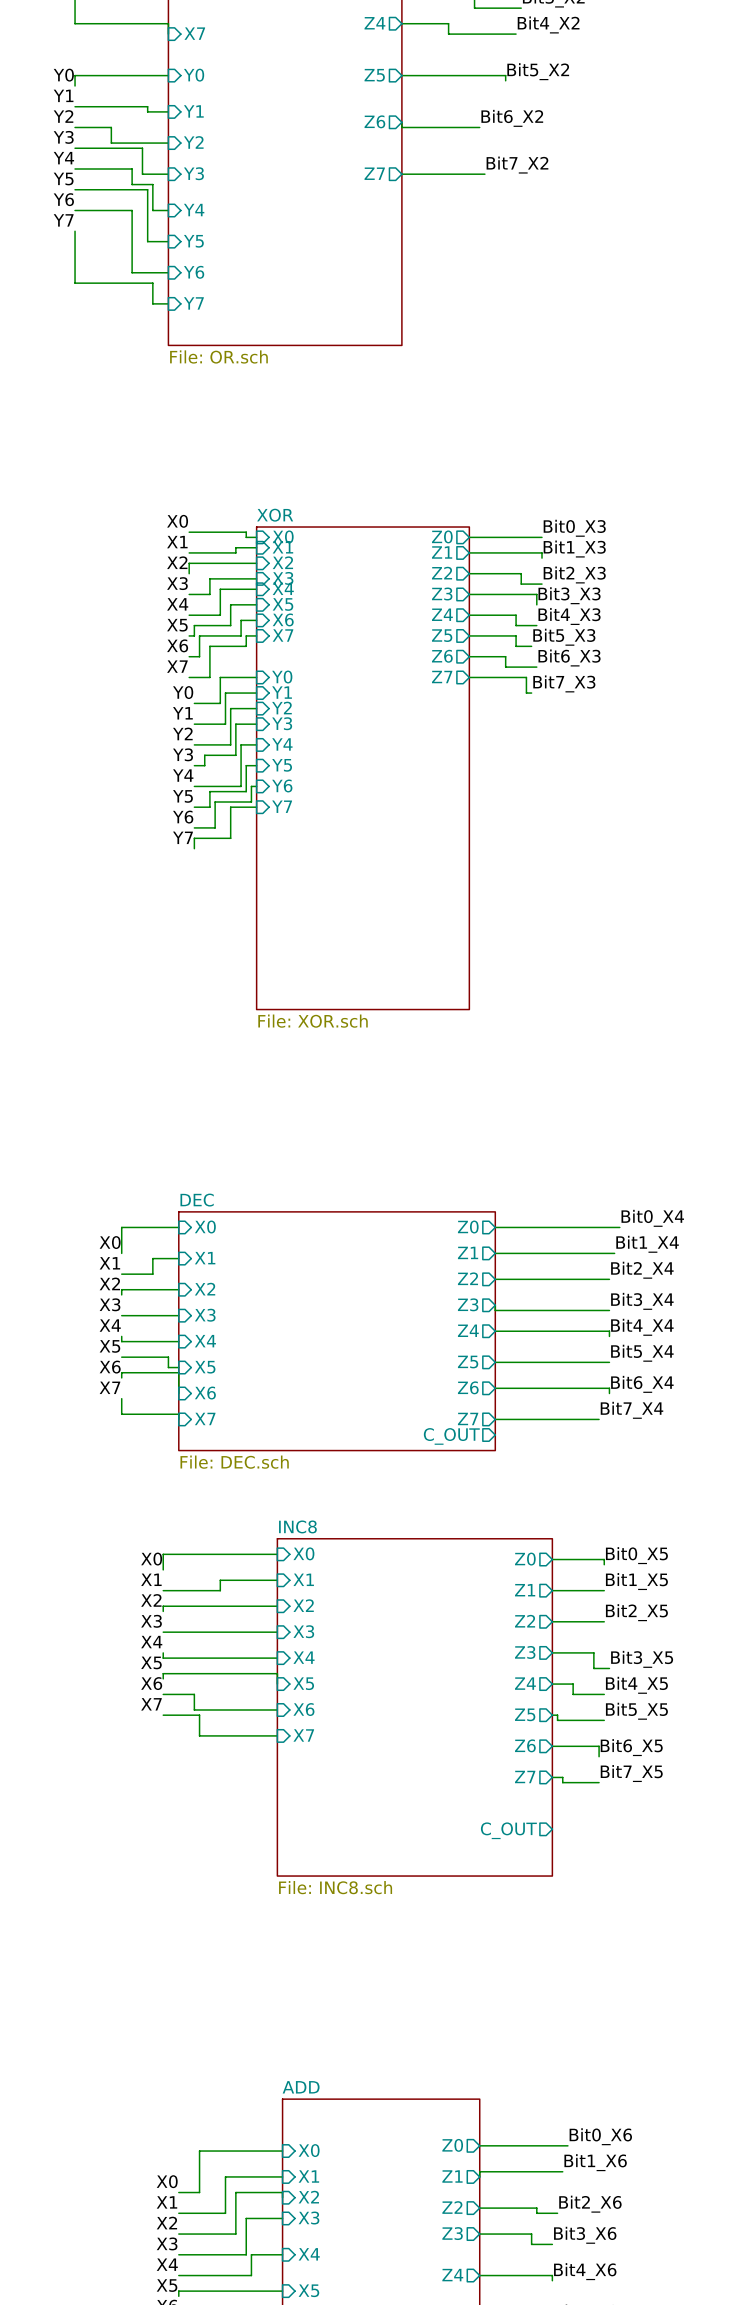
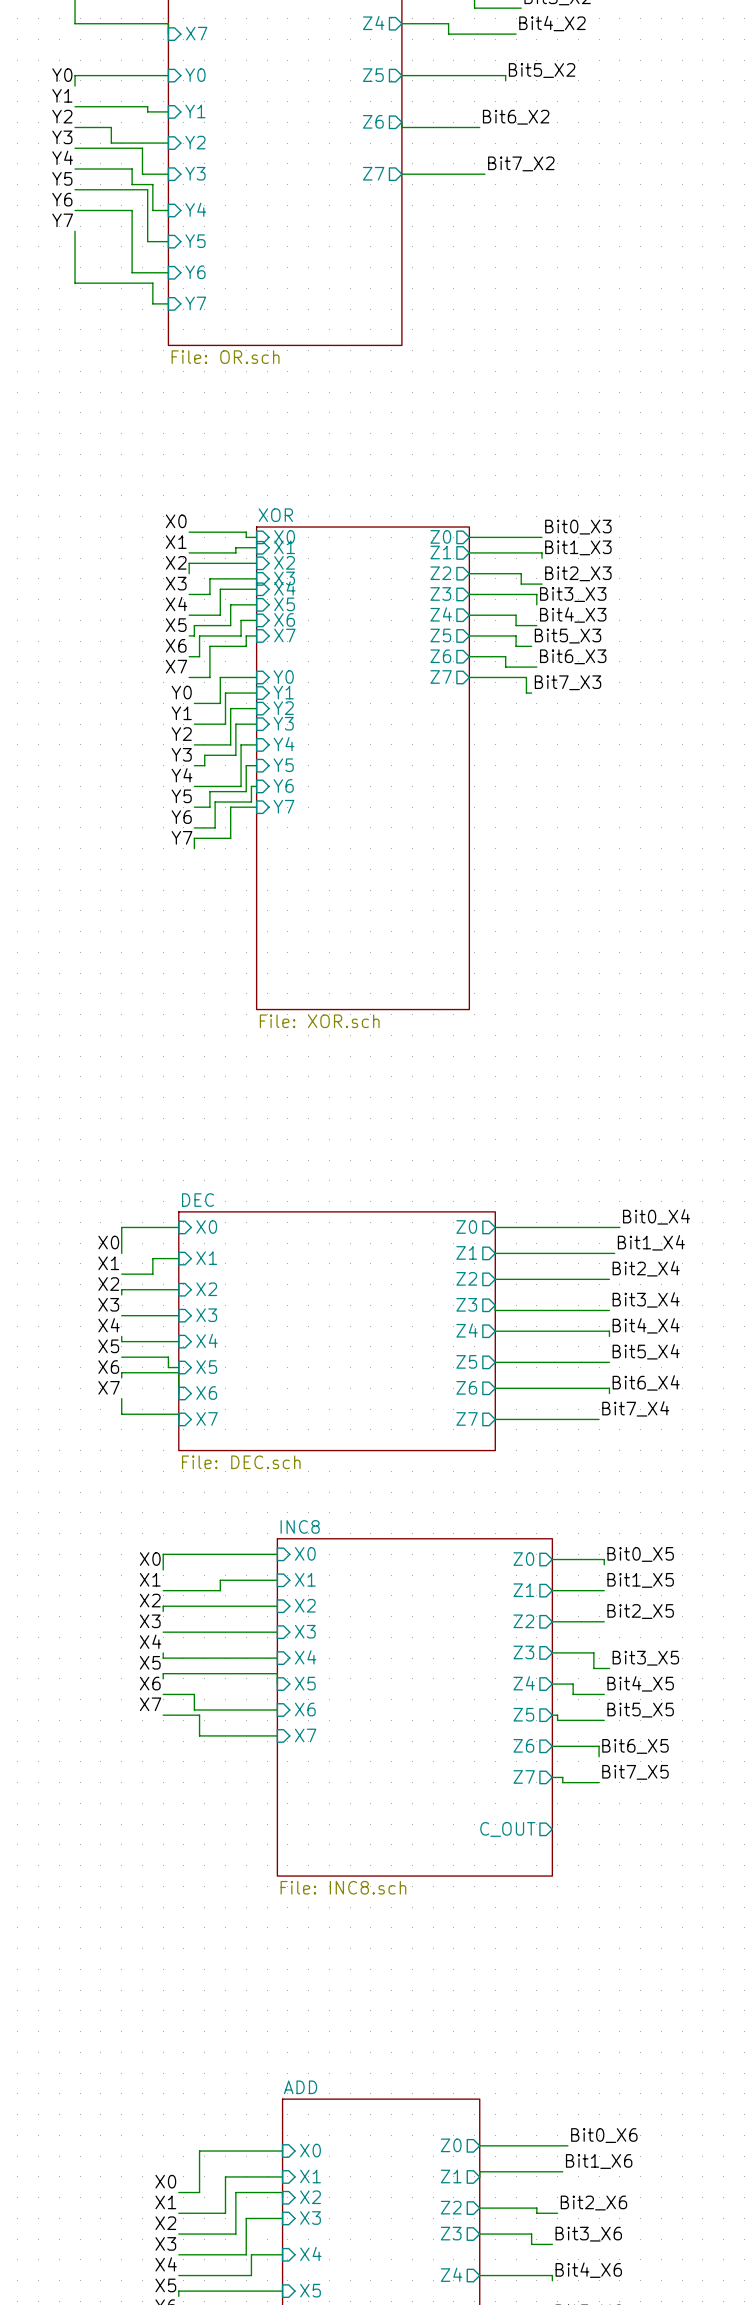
sheet pin: C_OUT (451, 1436) -> none

